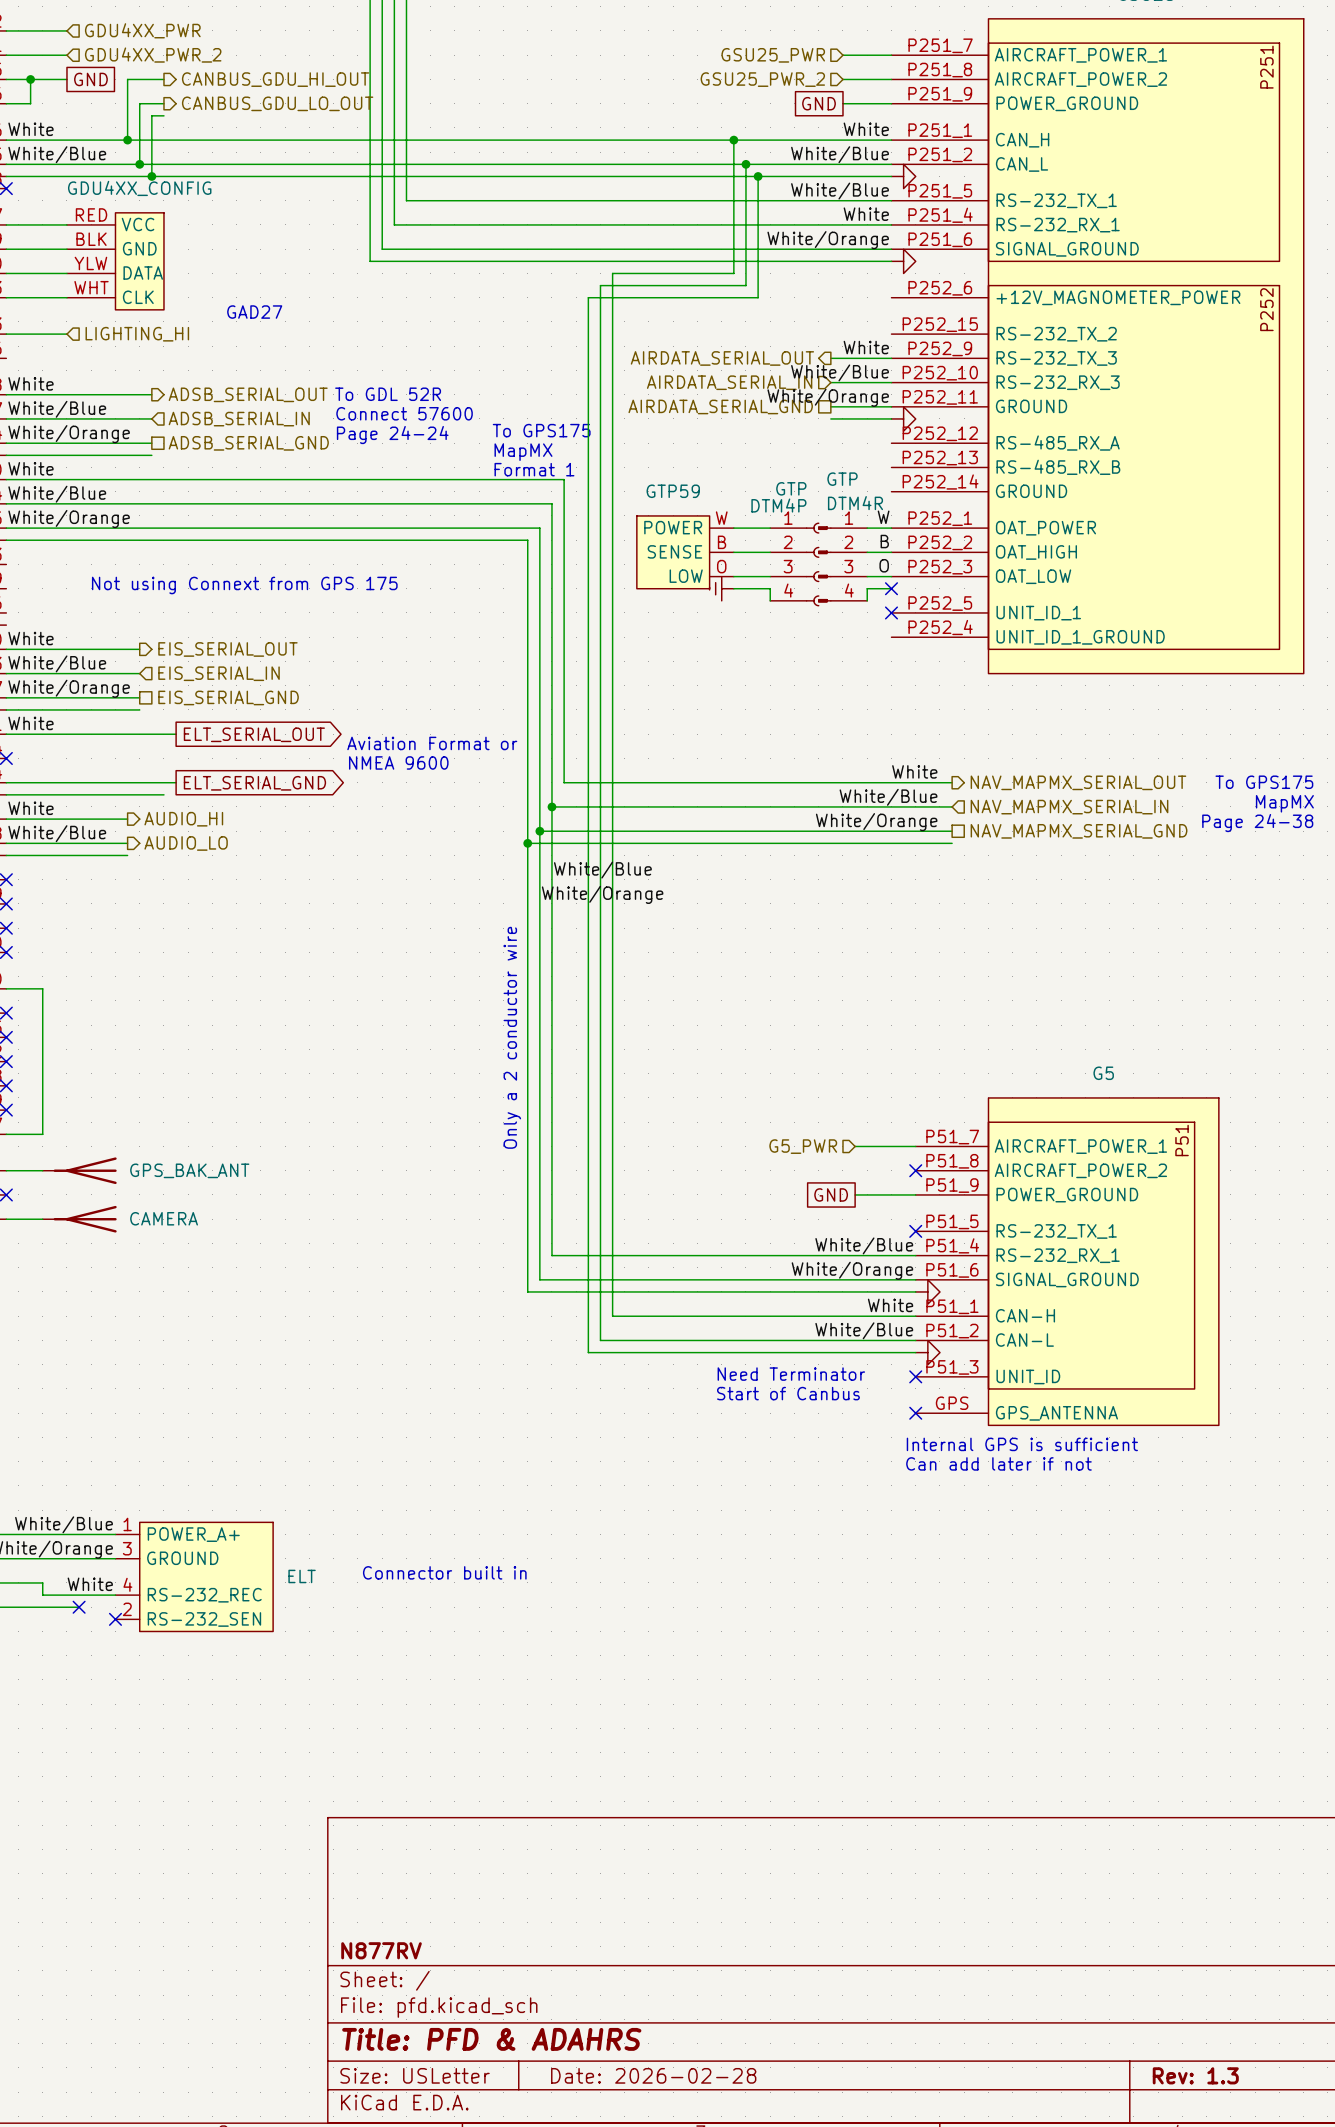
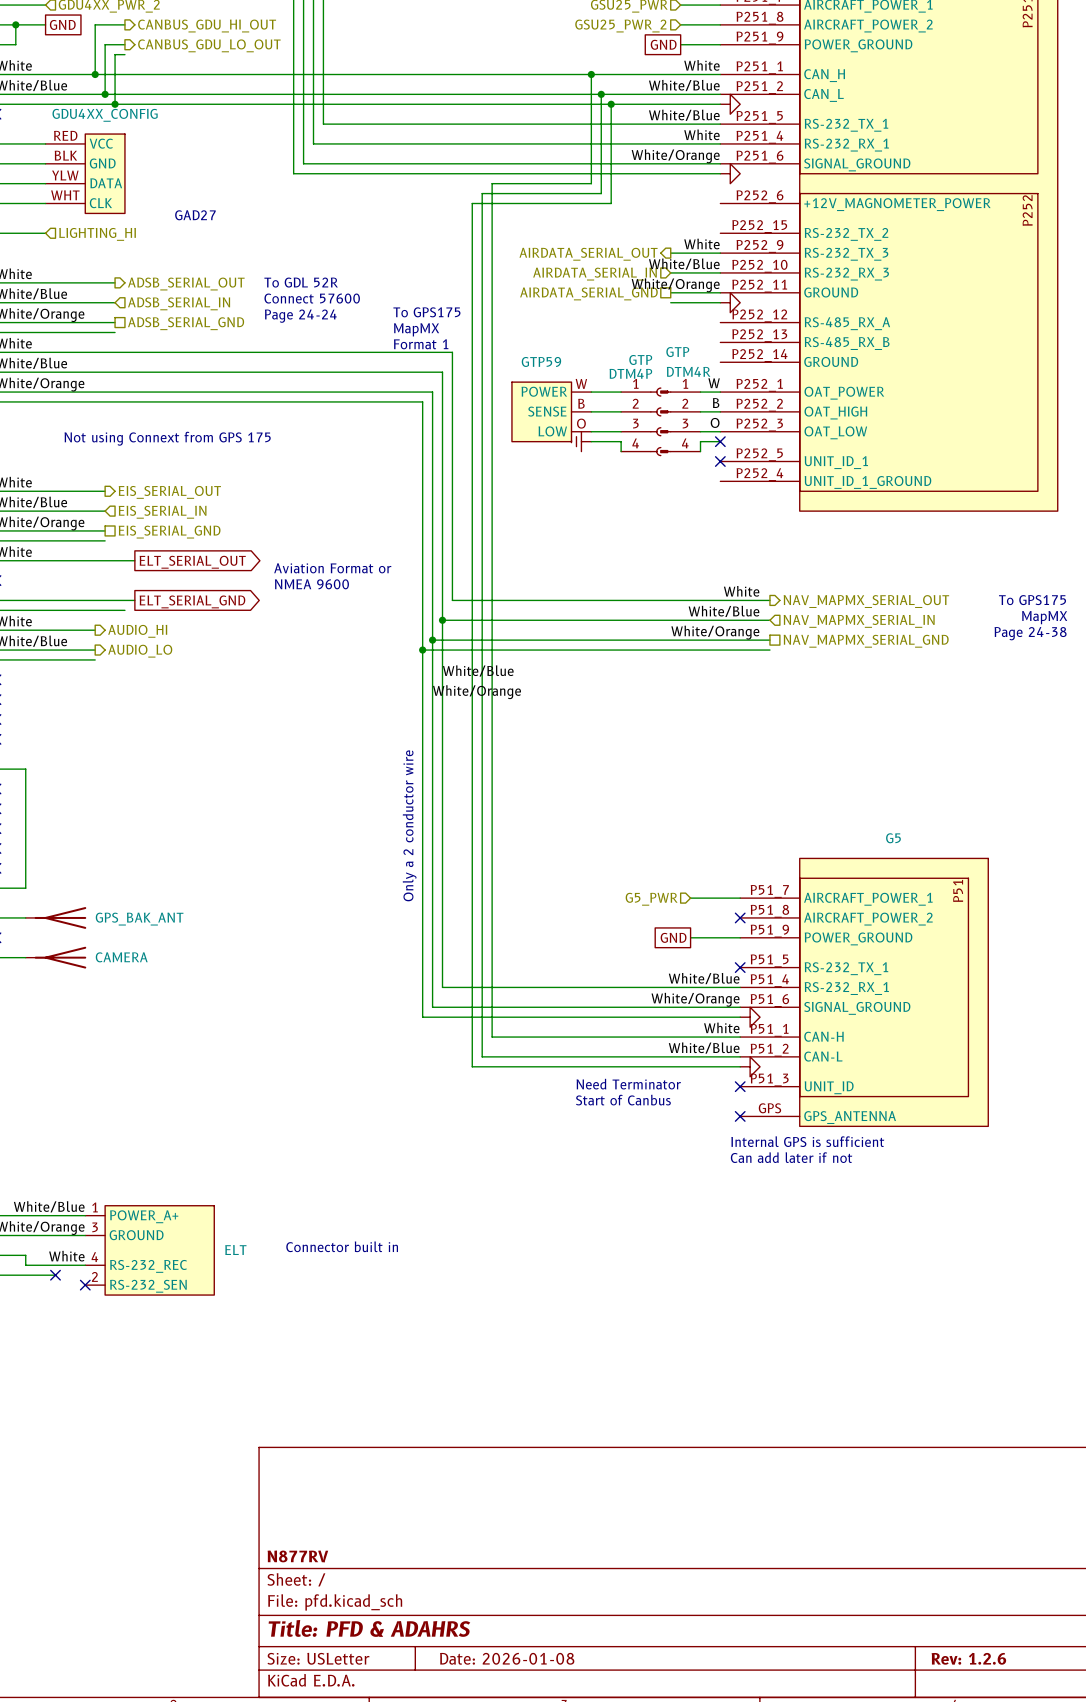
title block: Date: 2026-02-28 (653, 2075) -> Date: 2026-01-08 (507, 1658)
title block: Rev: 1.3 (1195, 2075) -> Rev: 1.2.6 (968, 1658)

